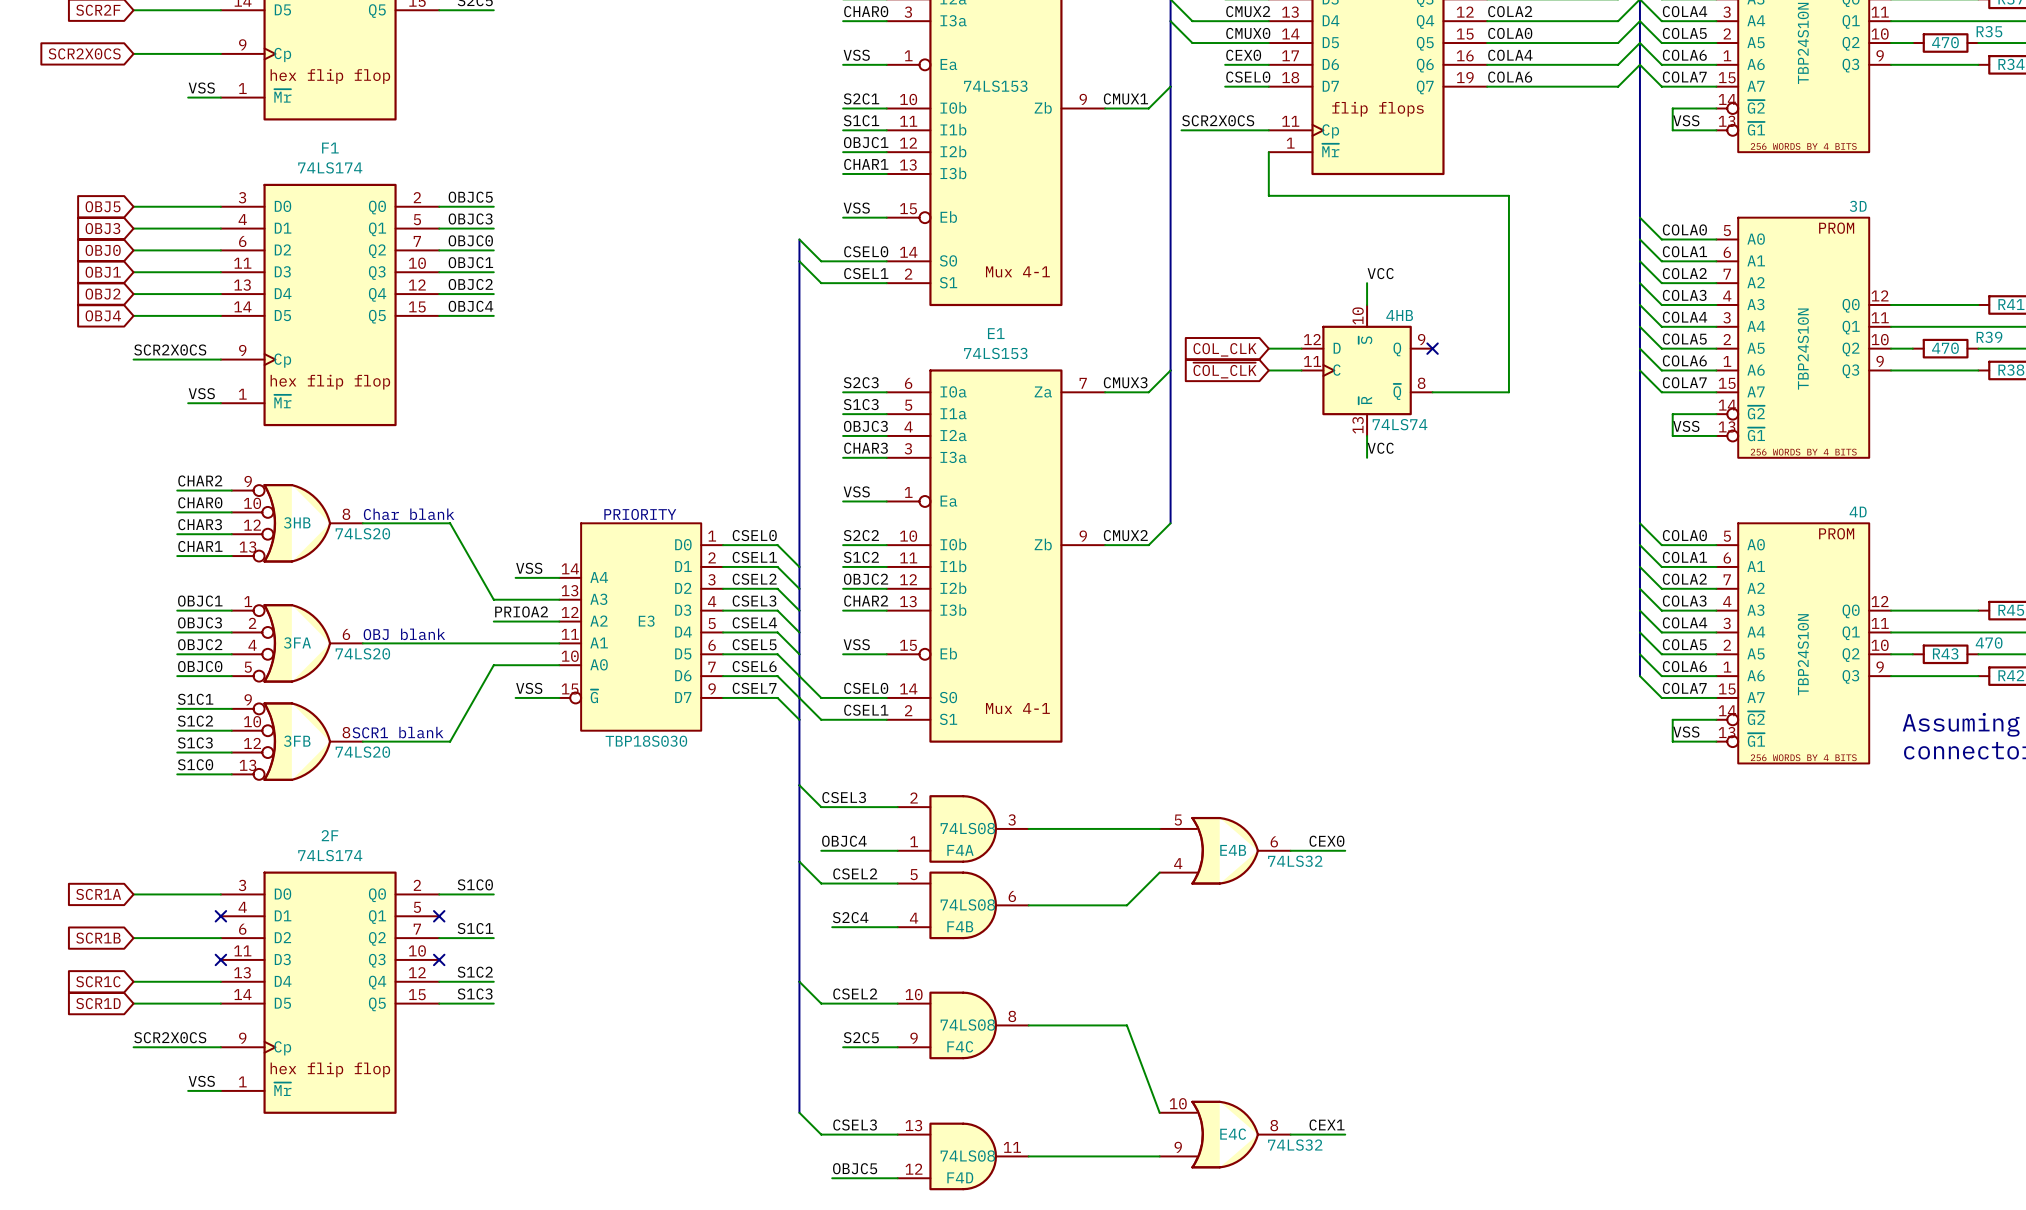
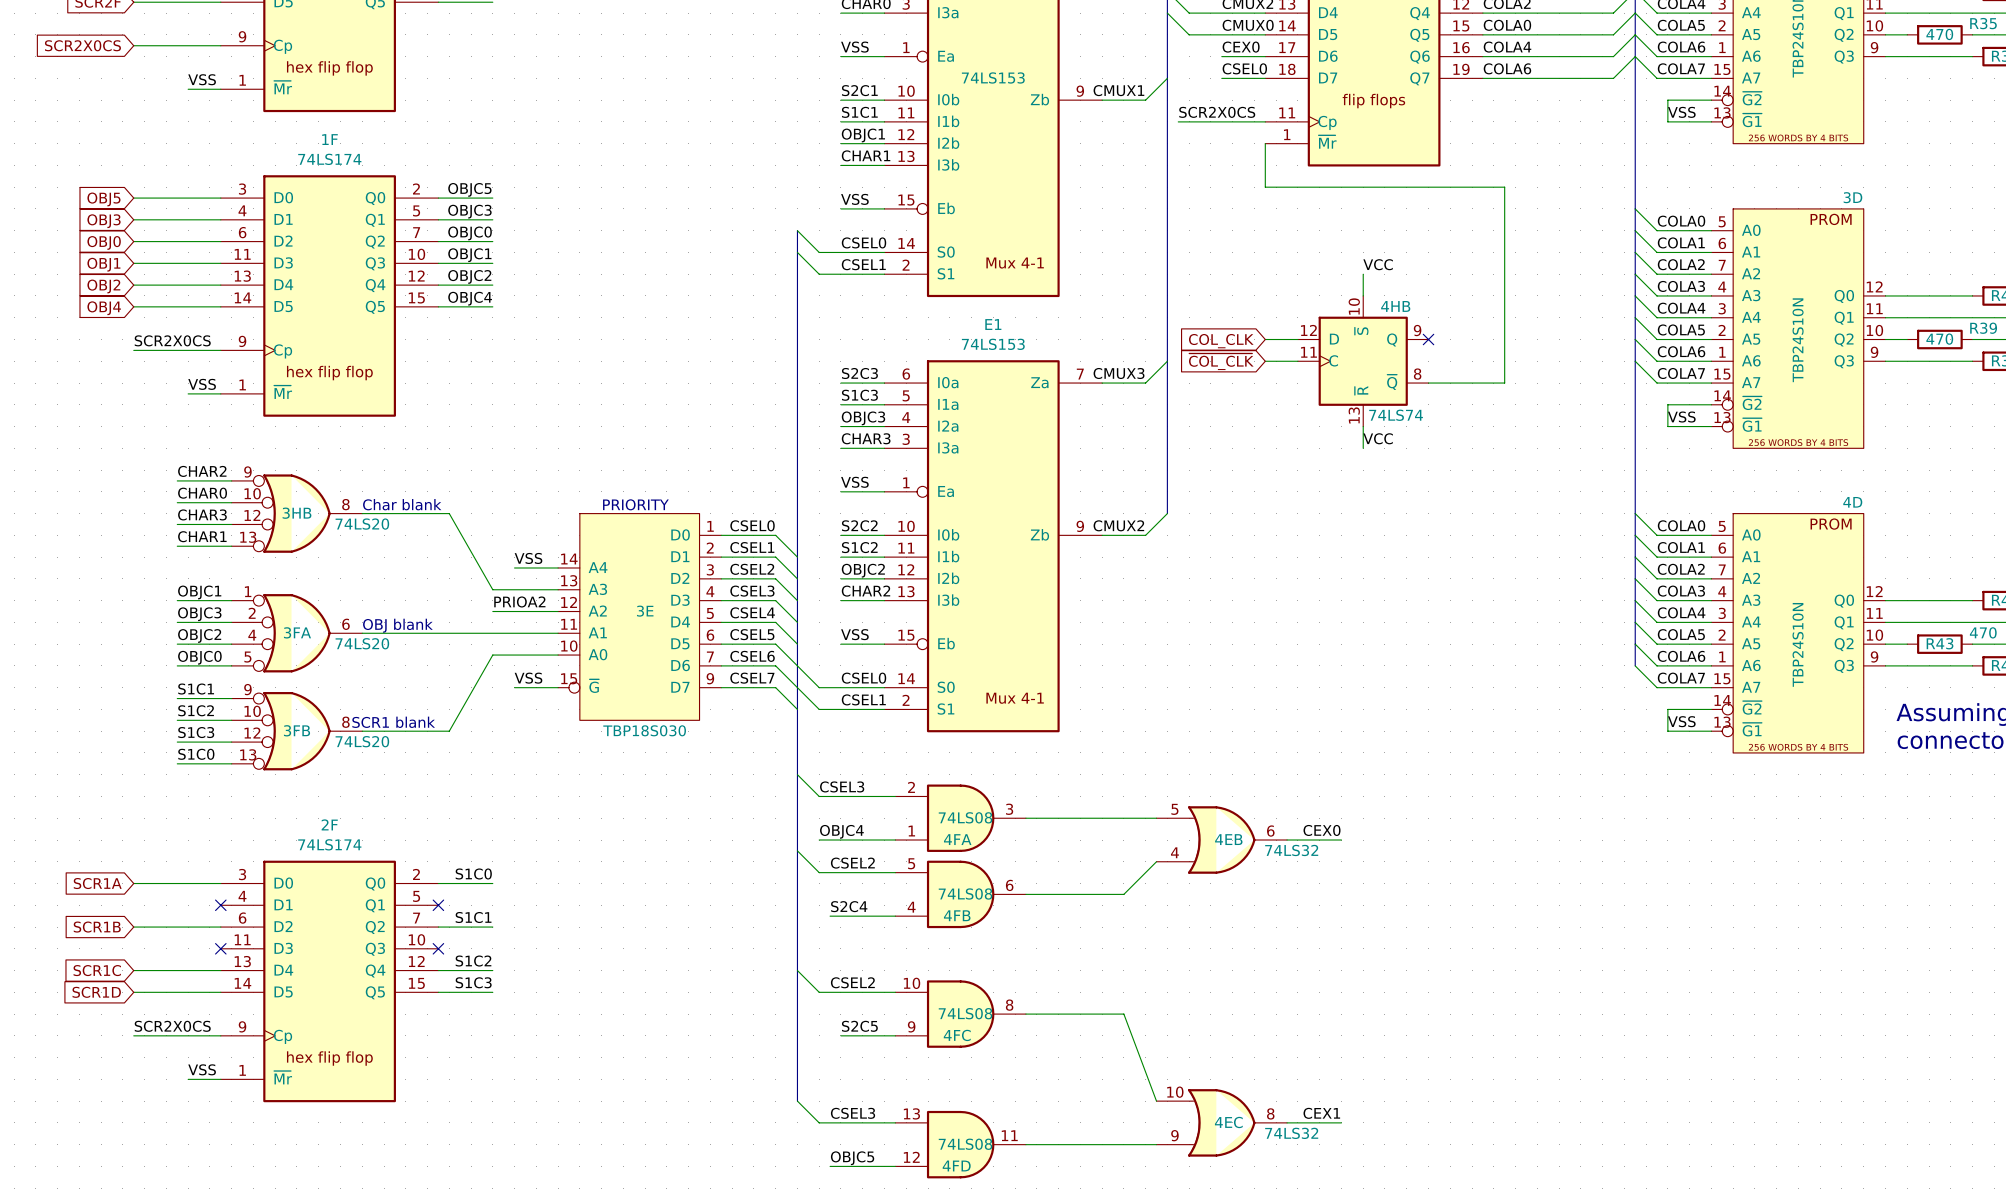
F1 name: F1 (330, 148) -> 1F (329, 139)
E3 name: E3 (646, 621) -> 3E (645, 611)
F4A name: F4A (960, 850) -> 4FA (957, 839)
E4B name: E4B (1233, 850) -> 4EB (1228, 839)
F4B name: F4B (960, 926) -> 4FB (957, 915)
F4C name: F4C (960, 1046) -> 4FC (957, 1035)
E4C name: E4C (1233, 1134) -> 4EC (1228, 1122)
F4D name: F4D (960, 1177) -> 4FD (956, 1166)

